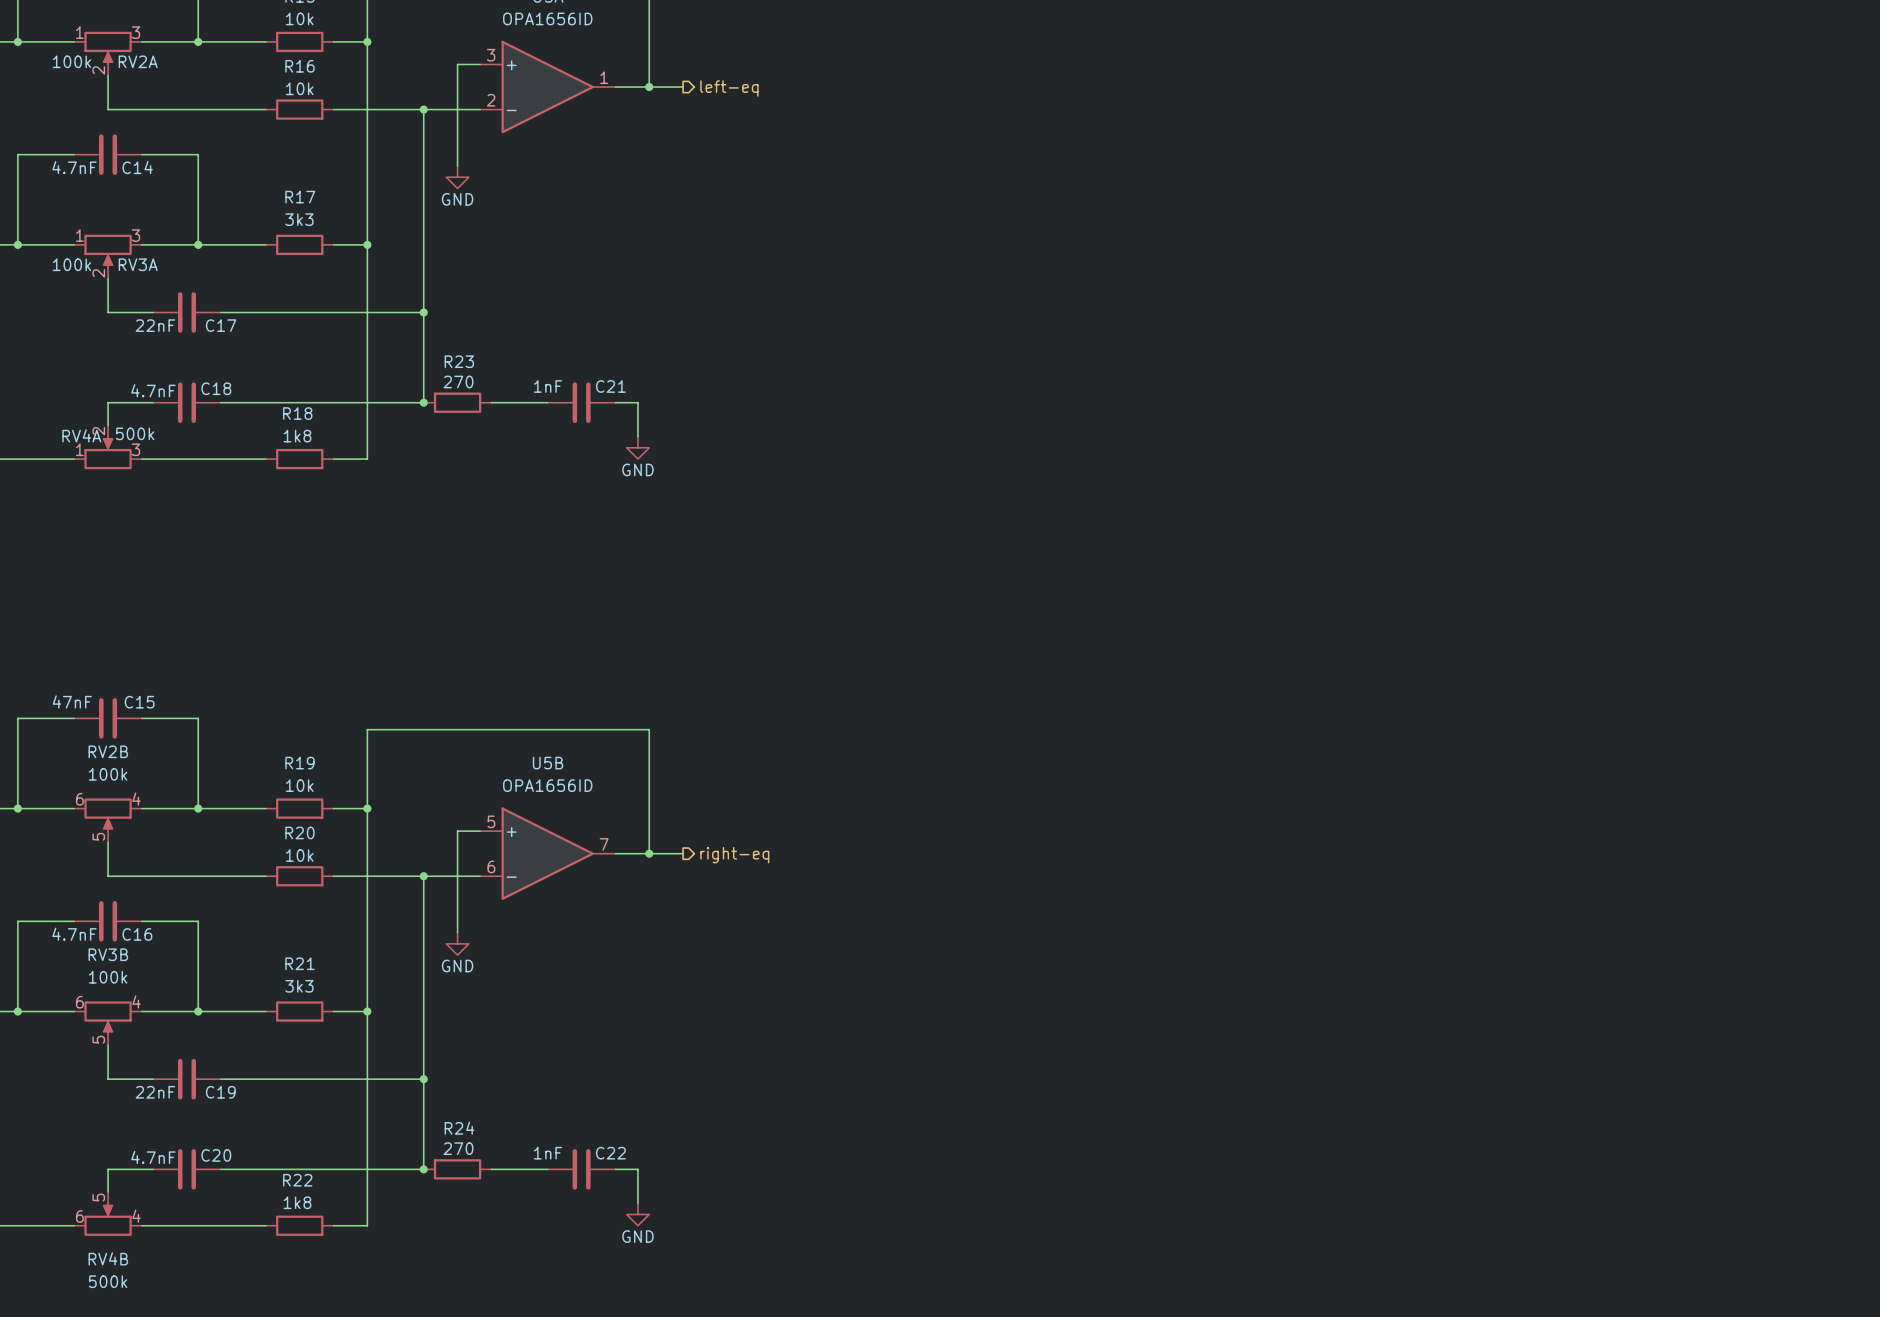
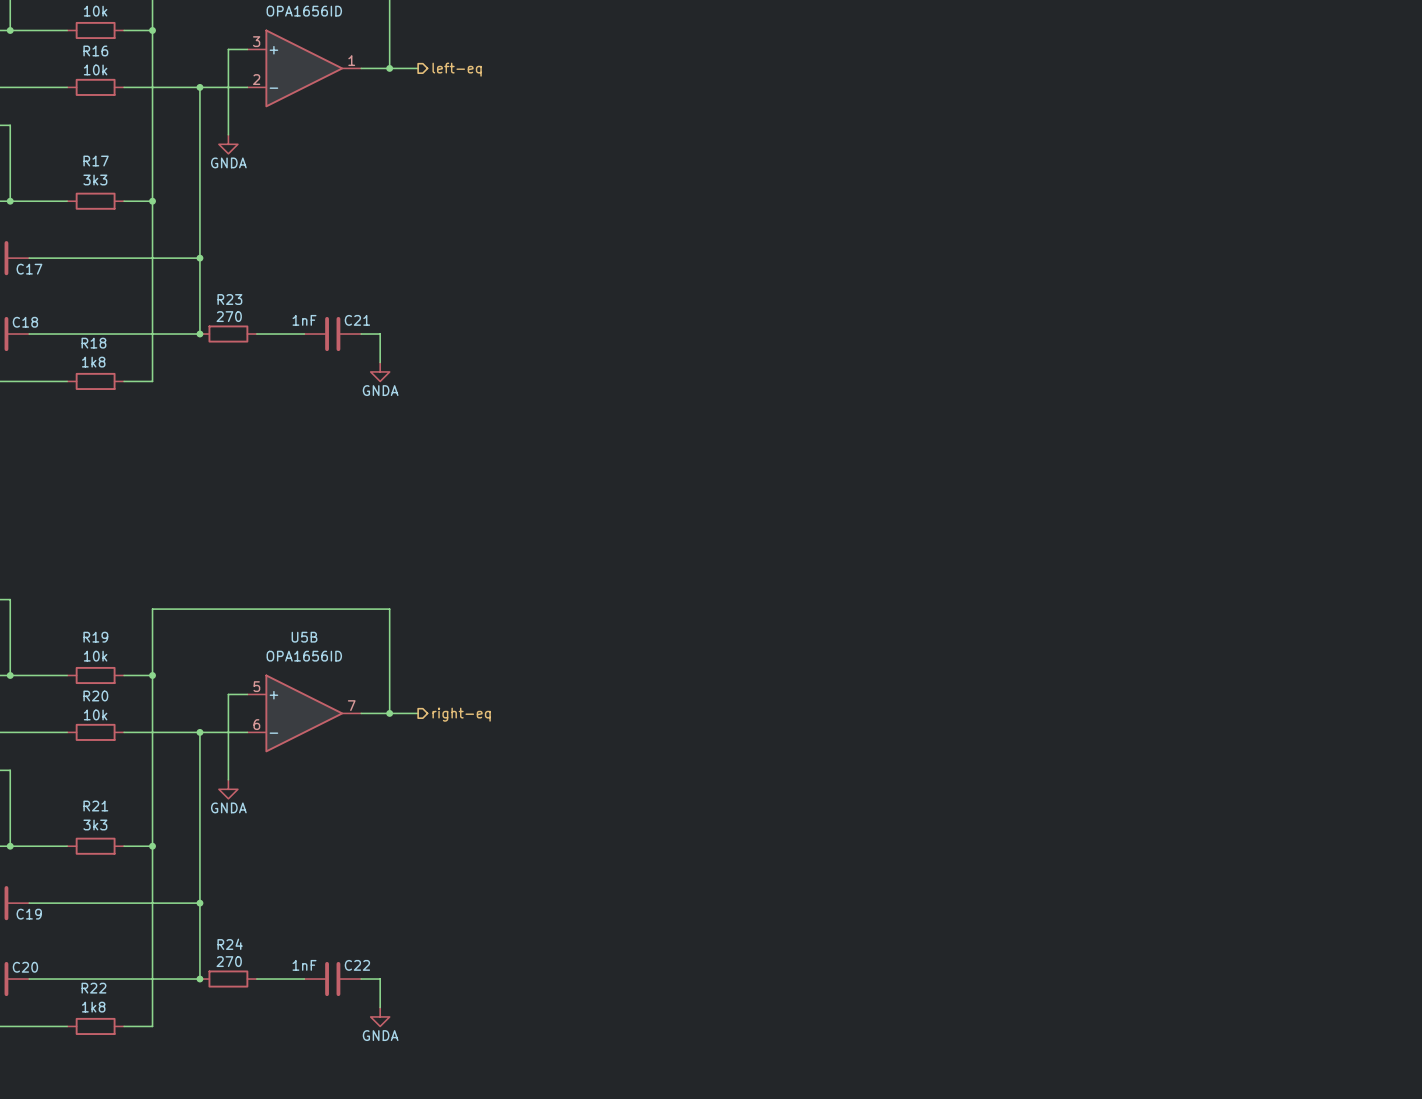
power symbol: GND (457, 177) -> GNDA (228, 144)
power symbol: GND (637, 447) -> GNDA (380, 371)
power symbol: GND (457, 943) -> GNDA (228, 789)
power symbol: GND (637, 1214) -> GNDA (380, 1016)

